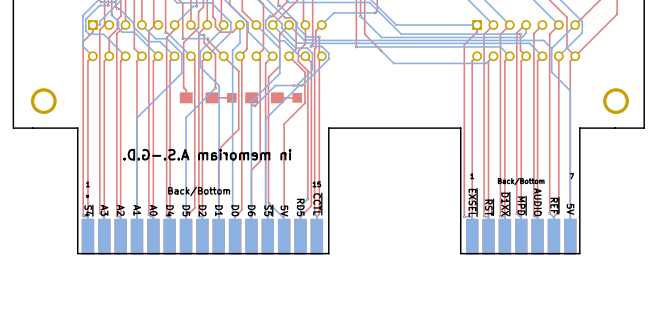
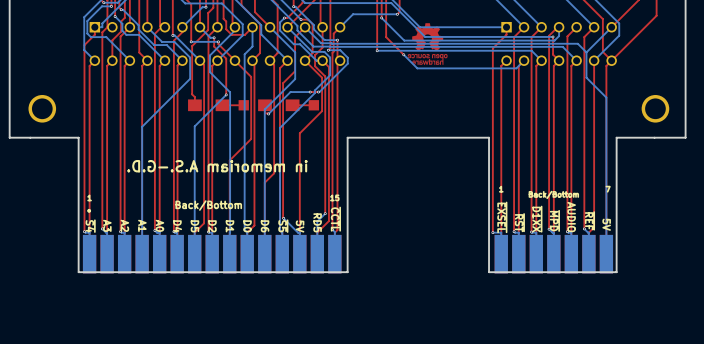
drawing: none -> [407, 23, 448, 65]

